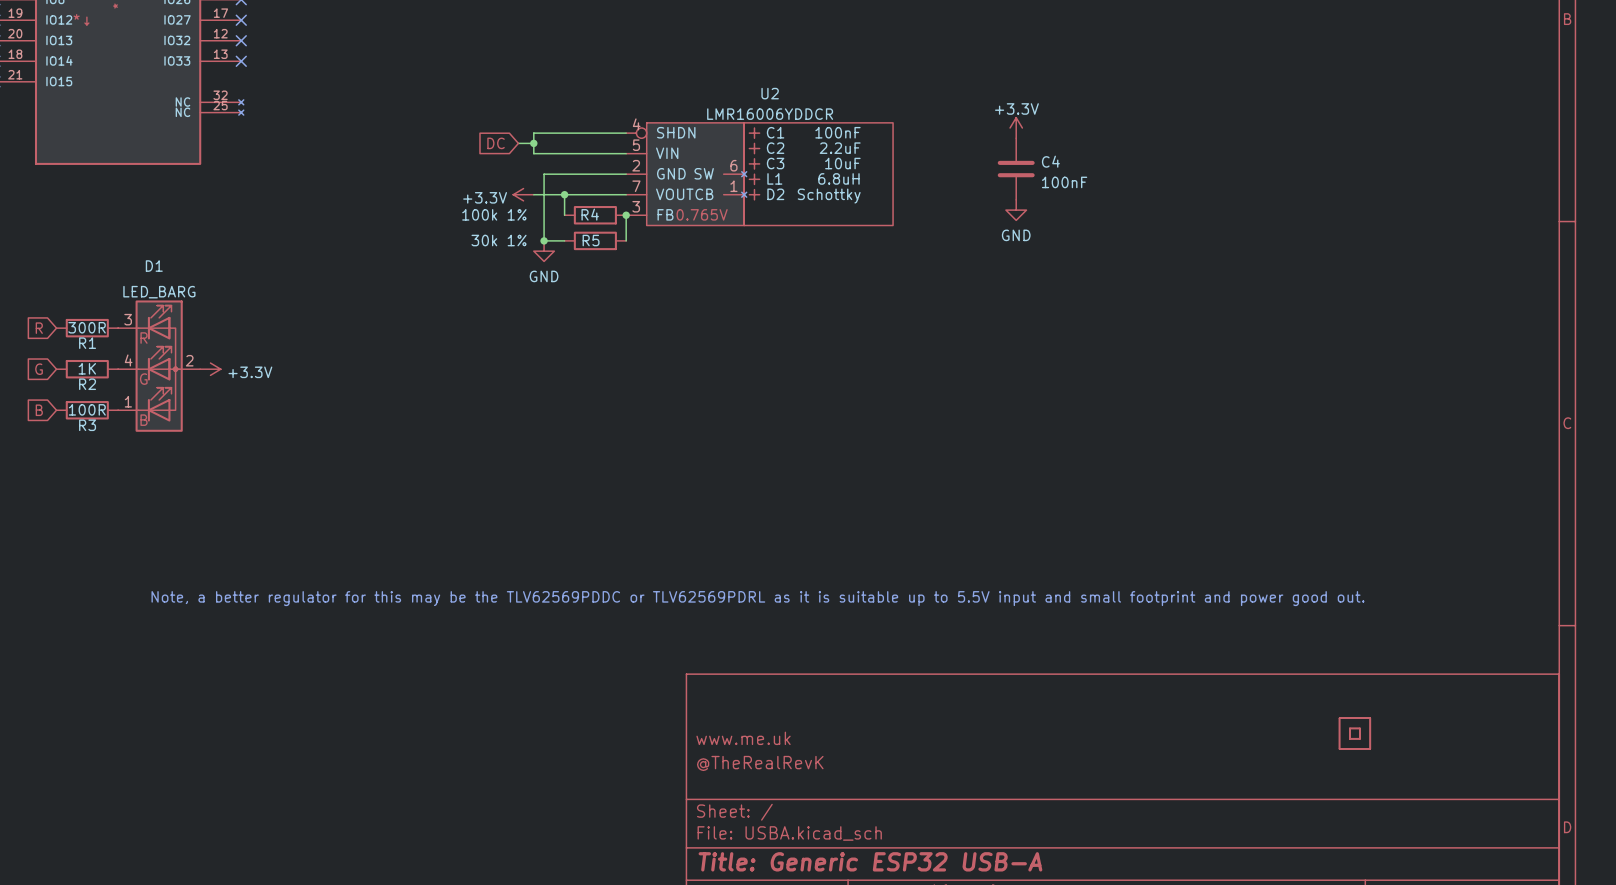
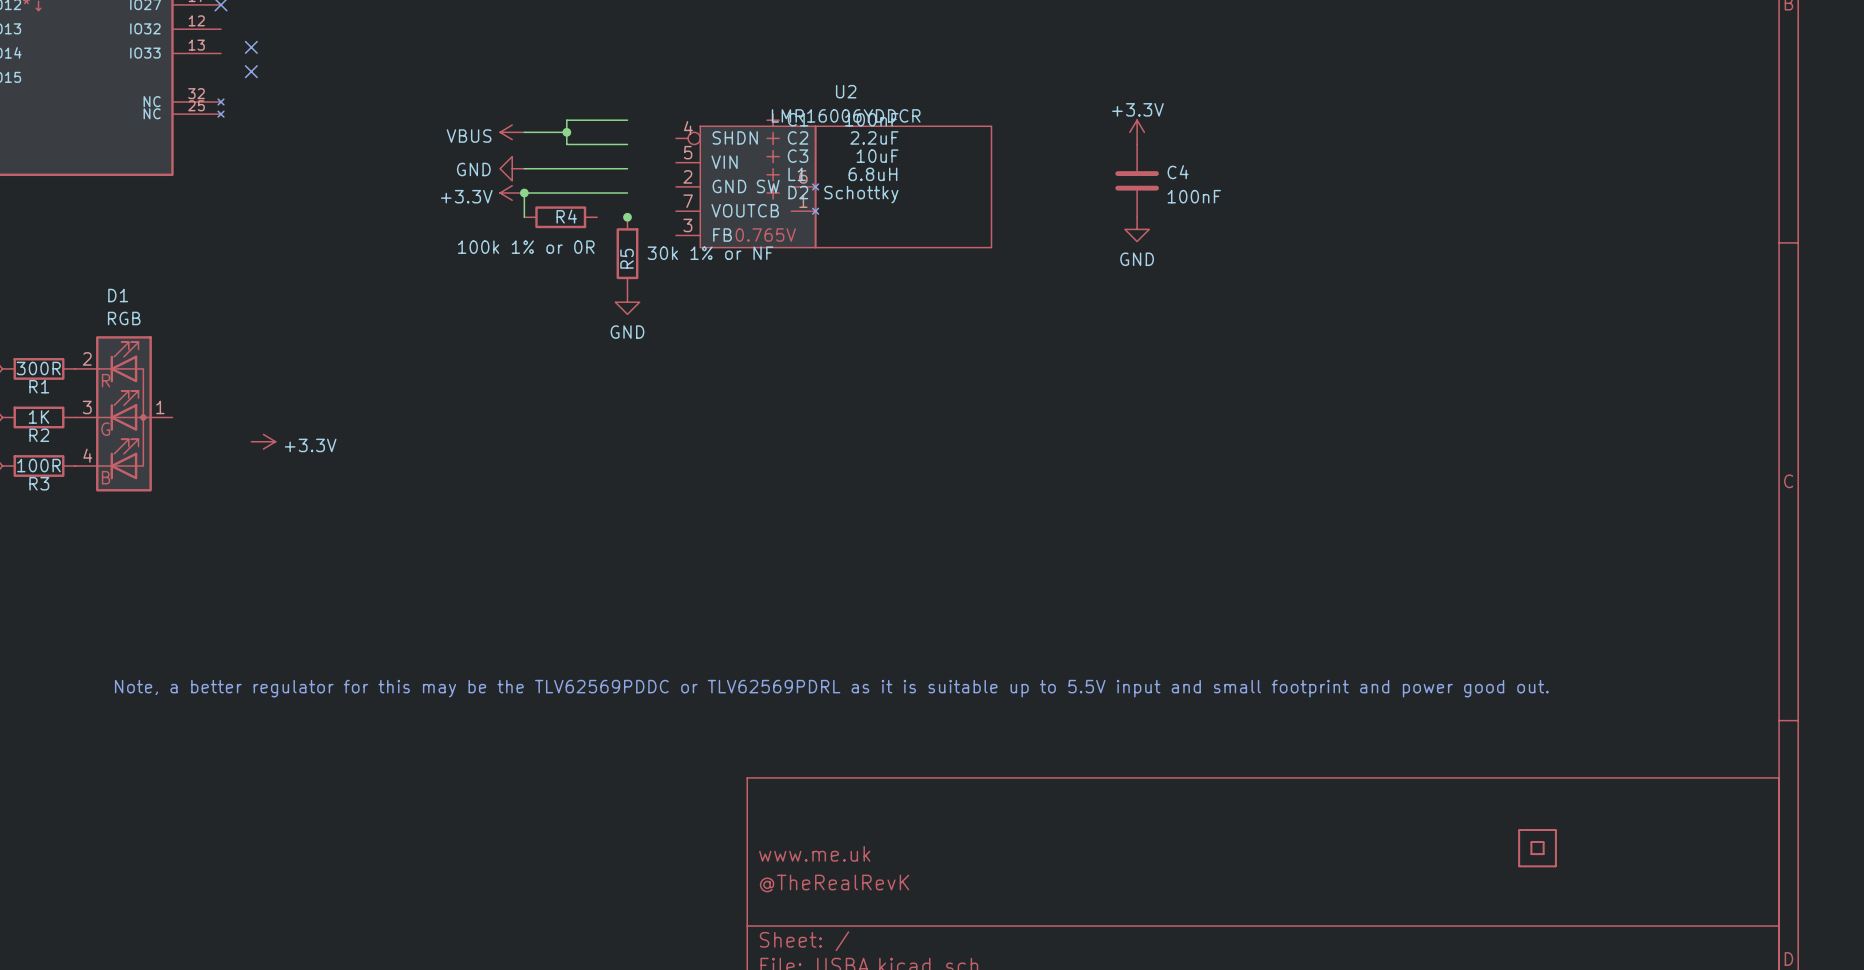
no-connect mark: (241, 40) -> none
no-connect mark: none -> (251, 47)
no-connect mark: (241, 61) -> none
no-connect mark: none -> (251, 71)
power symbol: none -> VBUS (512, 132)
wire: none -> (524, 132) (566, 132)
wire: (533, 133) (626, 133) -> (566, 138) (566, 120) (627, 120)
C1 position: (754, 133) -> (773, 120)
wire: (533, 138) (533, 153) (626, 153) -> (566, 144) (627, 144)
global label: DC (496, 143) -> none
wire: (518, 143) (533, 143) -> none
junction position: (533, 143) -> (566, 132)
C2 position: (754, 148) -> (773, 138)
power symbol: none -> GND (512, 168)
wire: none -> (524, 168) (627, 168)
C3 position: (754, 163) -> (773, 156)
wire: (626, 174) (544, 174) (544, 240) (564, 240) -> none
junction: none -> (524, 193)
wire: none -> (627, 193) (524, 193) (524, 217)
L1 position: (754, 179) -> (773, 174)
power symbol position: +3.3V (523, 194) -> +3.3V (512, 193)
wire: (533, 194) (626, 194) -> none
wire: (564, 194) (564, 215) -> none
junction position: (564, 194) -> (627, 217)
D2 position: (754, 194) -> (773, 193)
R4 value: 100k 1% (494, 214) -> 100k 1% or 0R (526, 247)
R4 name position: R4 (590, 214) -> R4 (566, 216)
R4 position: (595, 215) -> (560, 217)
wire: (626, 215) (626, 240) -> none
junction: (626, 215) -> none
R5 value: 30k 1% (499, 240) -> 30k 1% or NF (710, 253)
junction: (544, 240) -> none
R5 rotation: 0° (595, 240) -> 90° clockwise (627, 253)
power symbol position: GND (544, 251) -> GND (627, 302)
D1 value: LED_BARG (159, 292) -> RGB (124, 318)
D1 pin number: 3 (128, 319) -> 2 (87, 358)
D1 pin number: 4 (128, 360) -> 3 (87, 407)
D1 pin number: 2 (189, 360) -> 1 (160, 407)
power symbol position: +3.3V (210, 369) -> +3.3V (263, 441)
D1 pin number: 1 (128, 401) -> 4 (87, 455)

